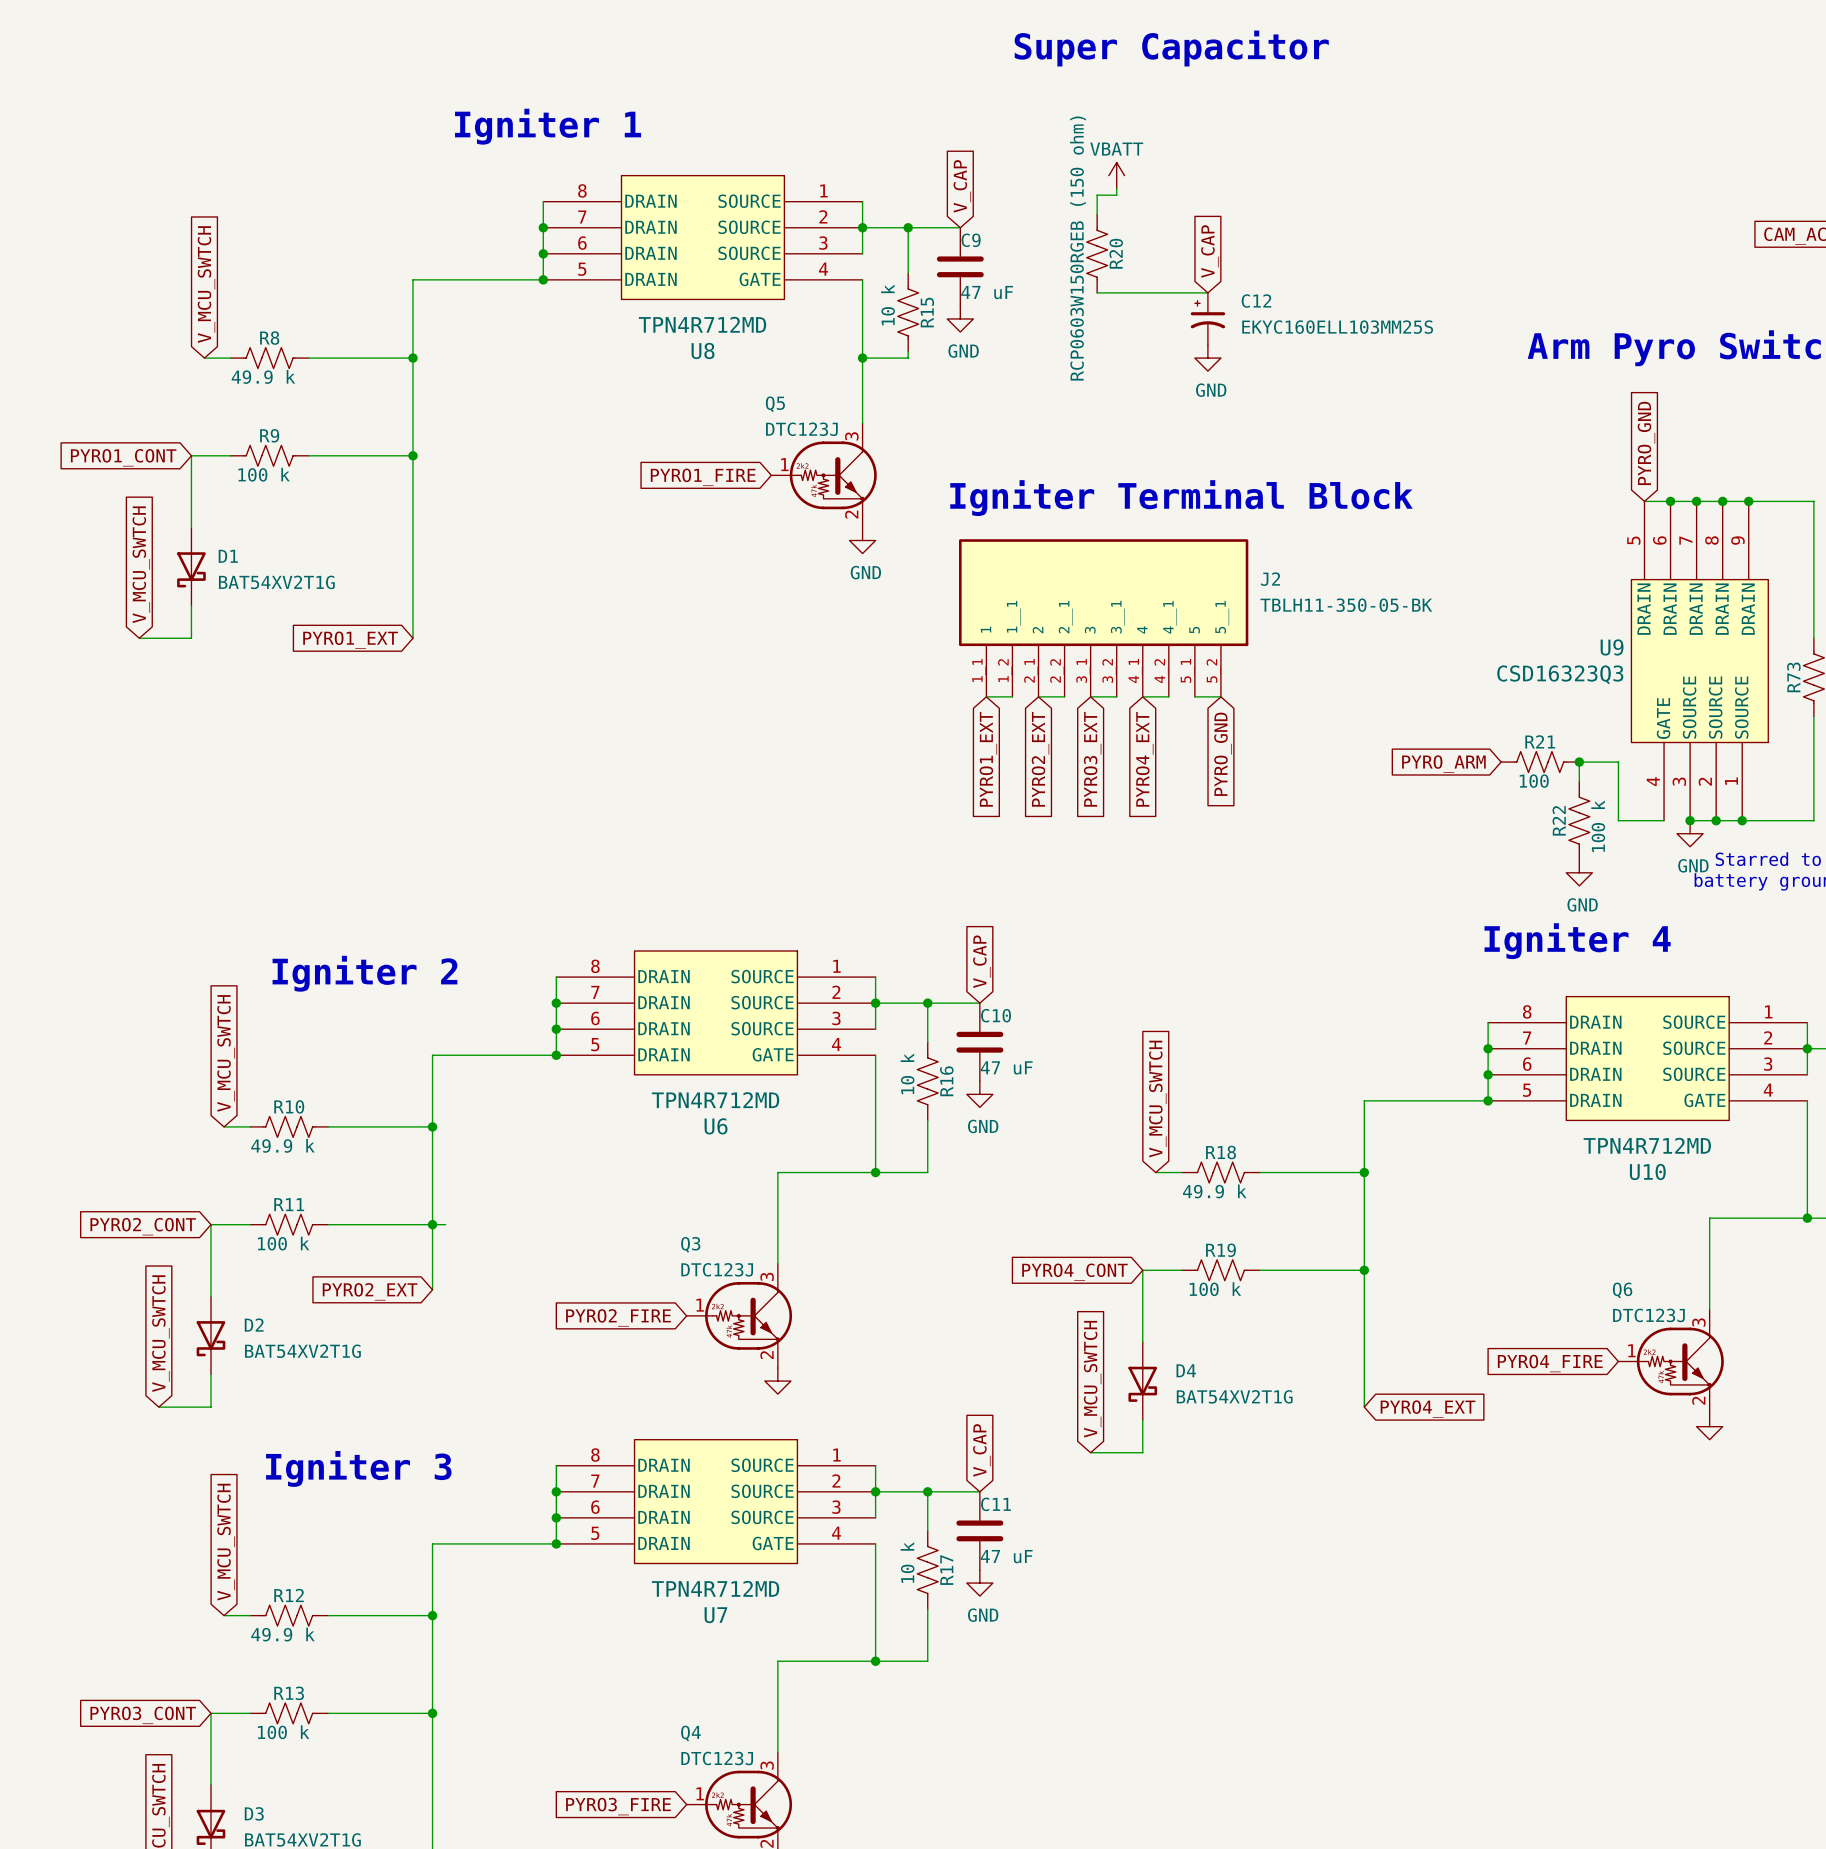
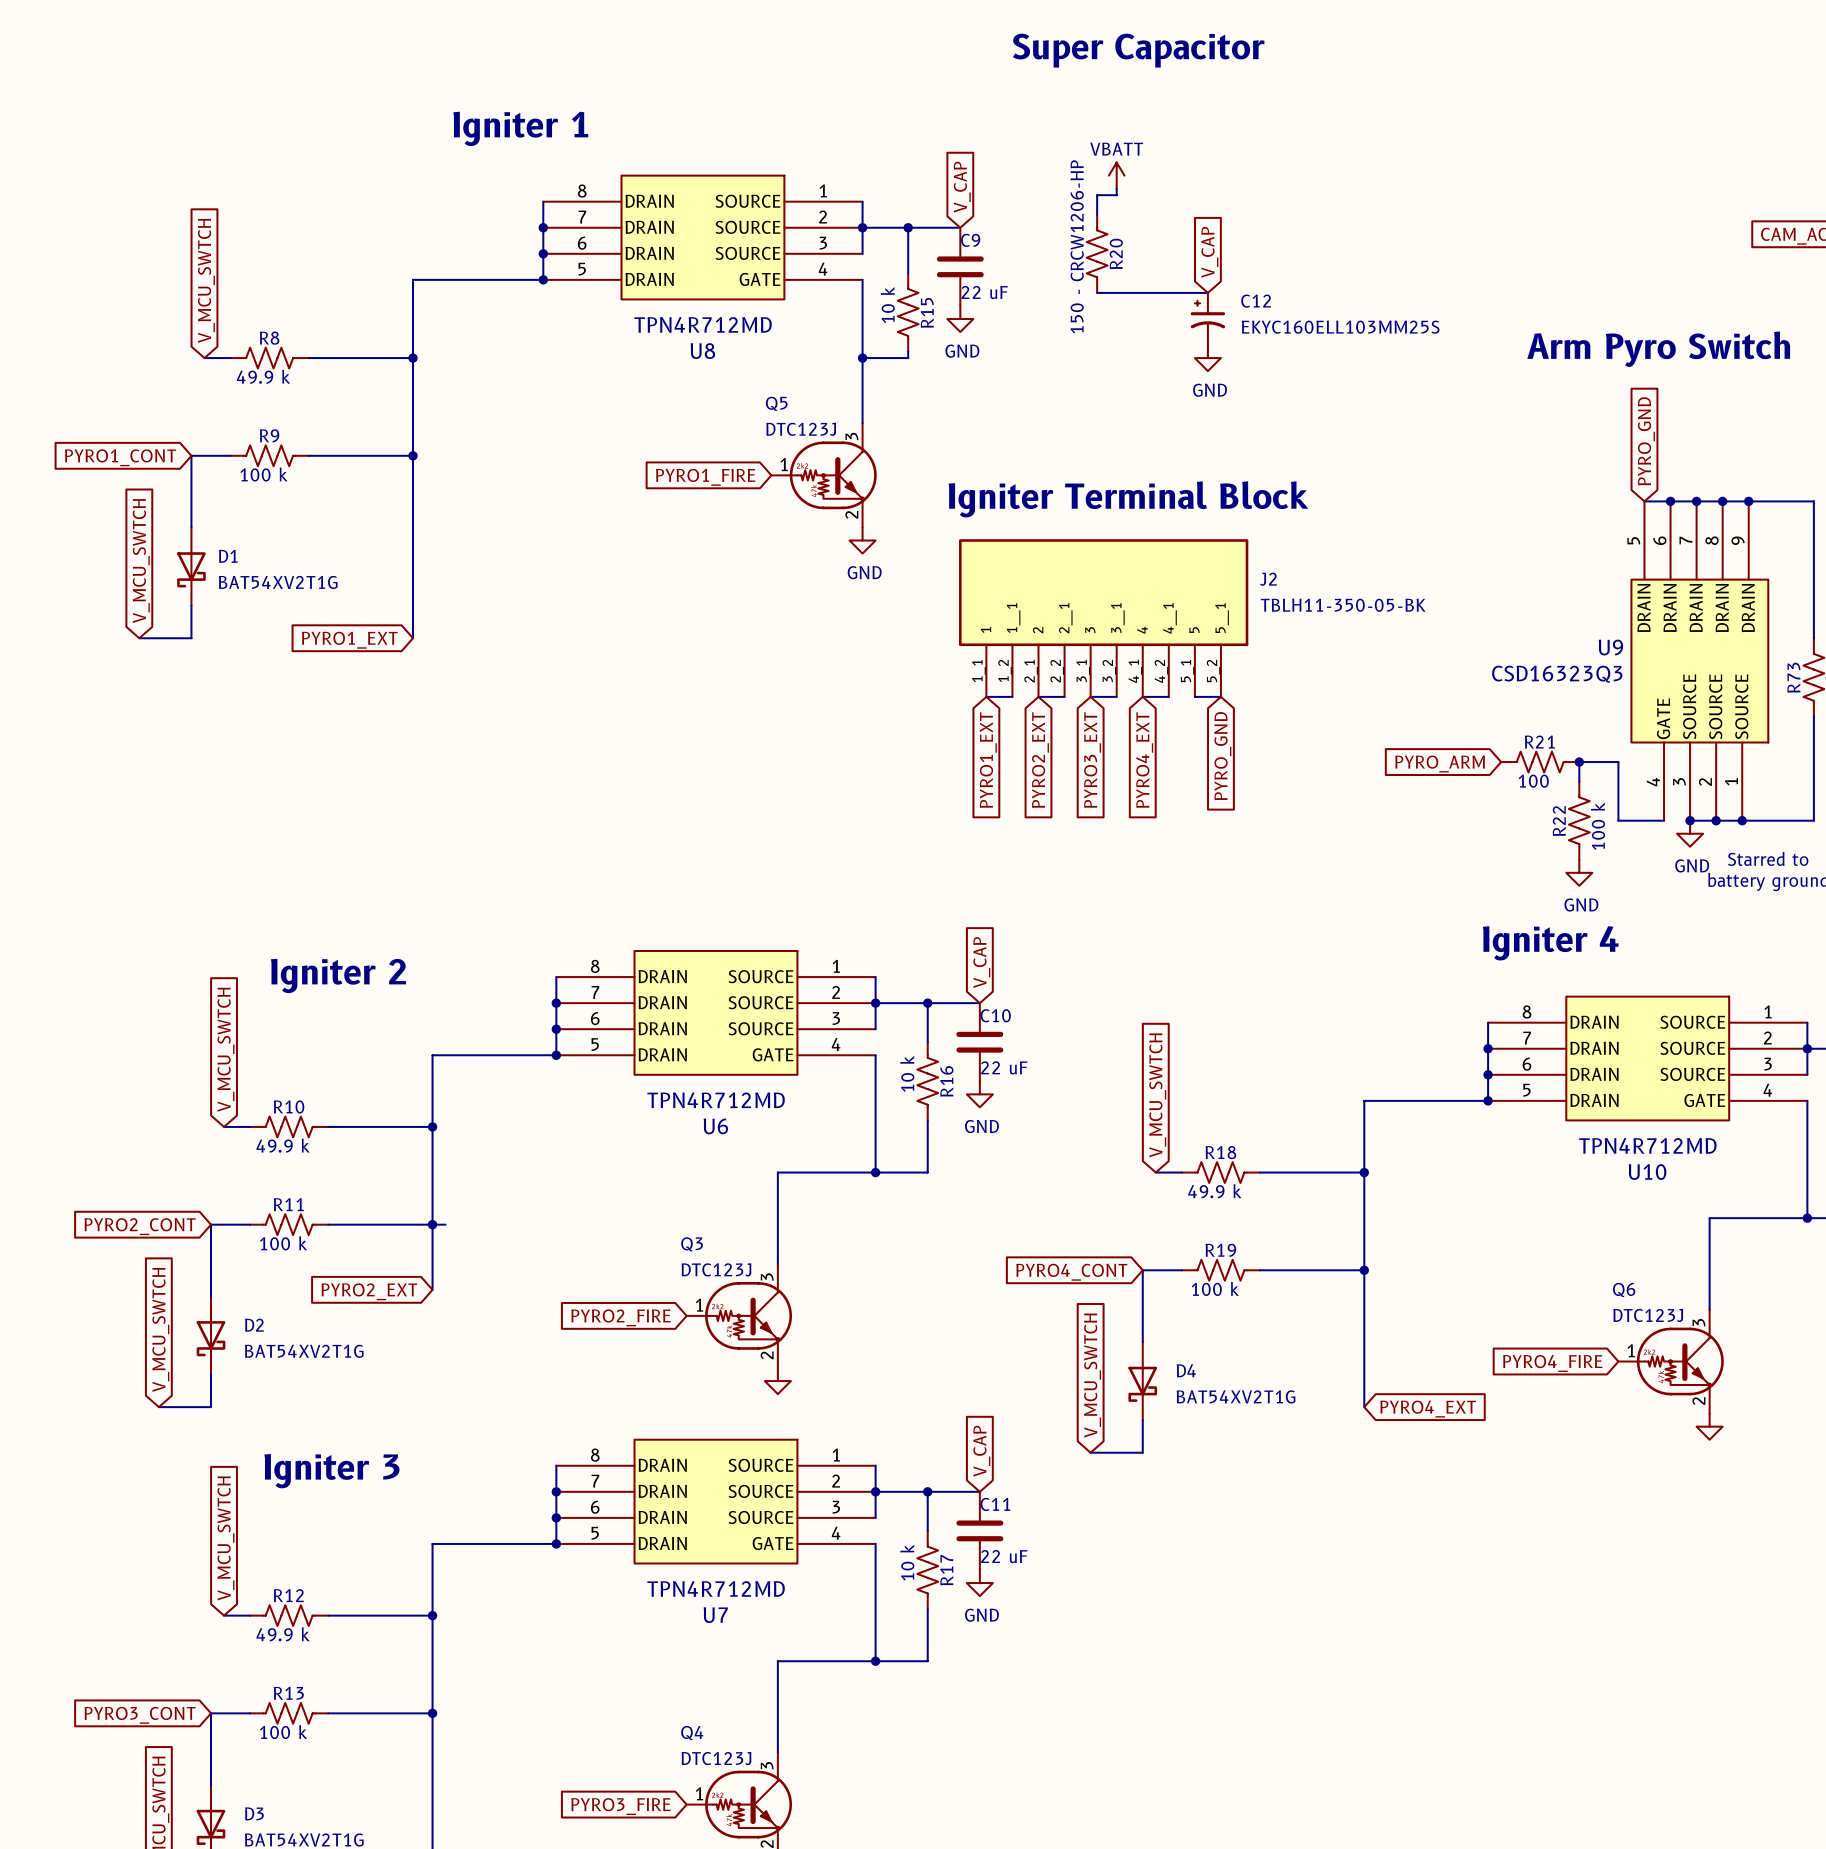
R20 value: RCP0603W150RGEB (150 ohm) (1078, 248) -> 150 - CRCW1206-HP (1077, 246)
C9 value: 47 uF (987, 292) -> 22 uF (984, 292)
C10 value: 47 uF (1006, 1067) -> 22 uF (1004, 1067)
C11 value: 47 uF (1006, 1556) -> 22 uF (1004, 1556)

